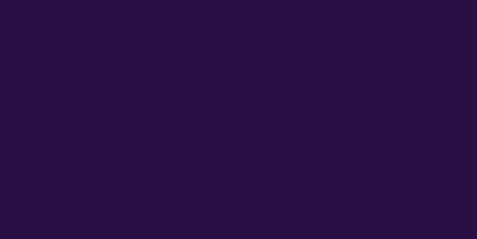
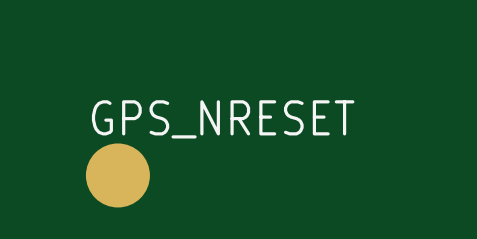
GPS_NRESET: none -> (117, 175)

